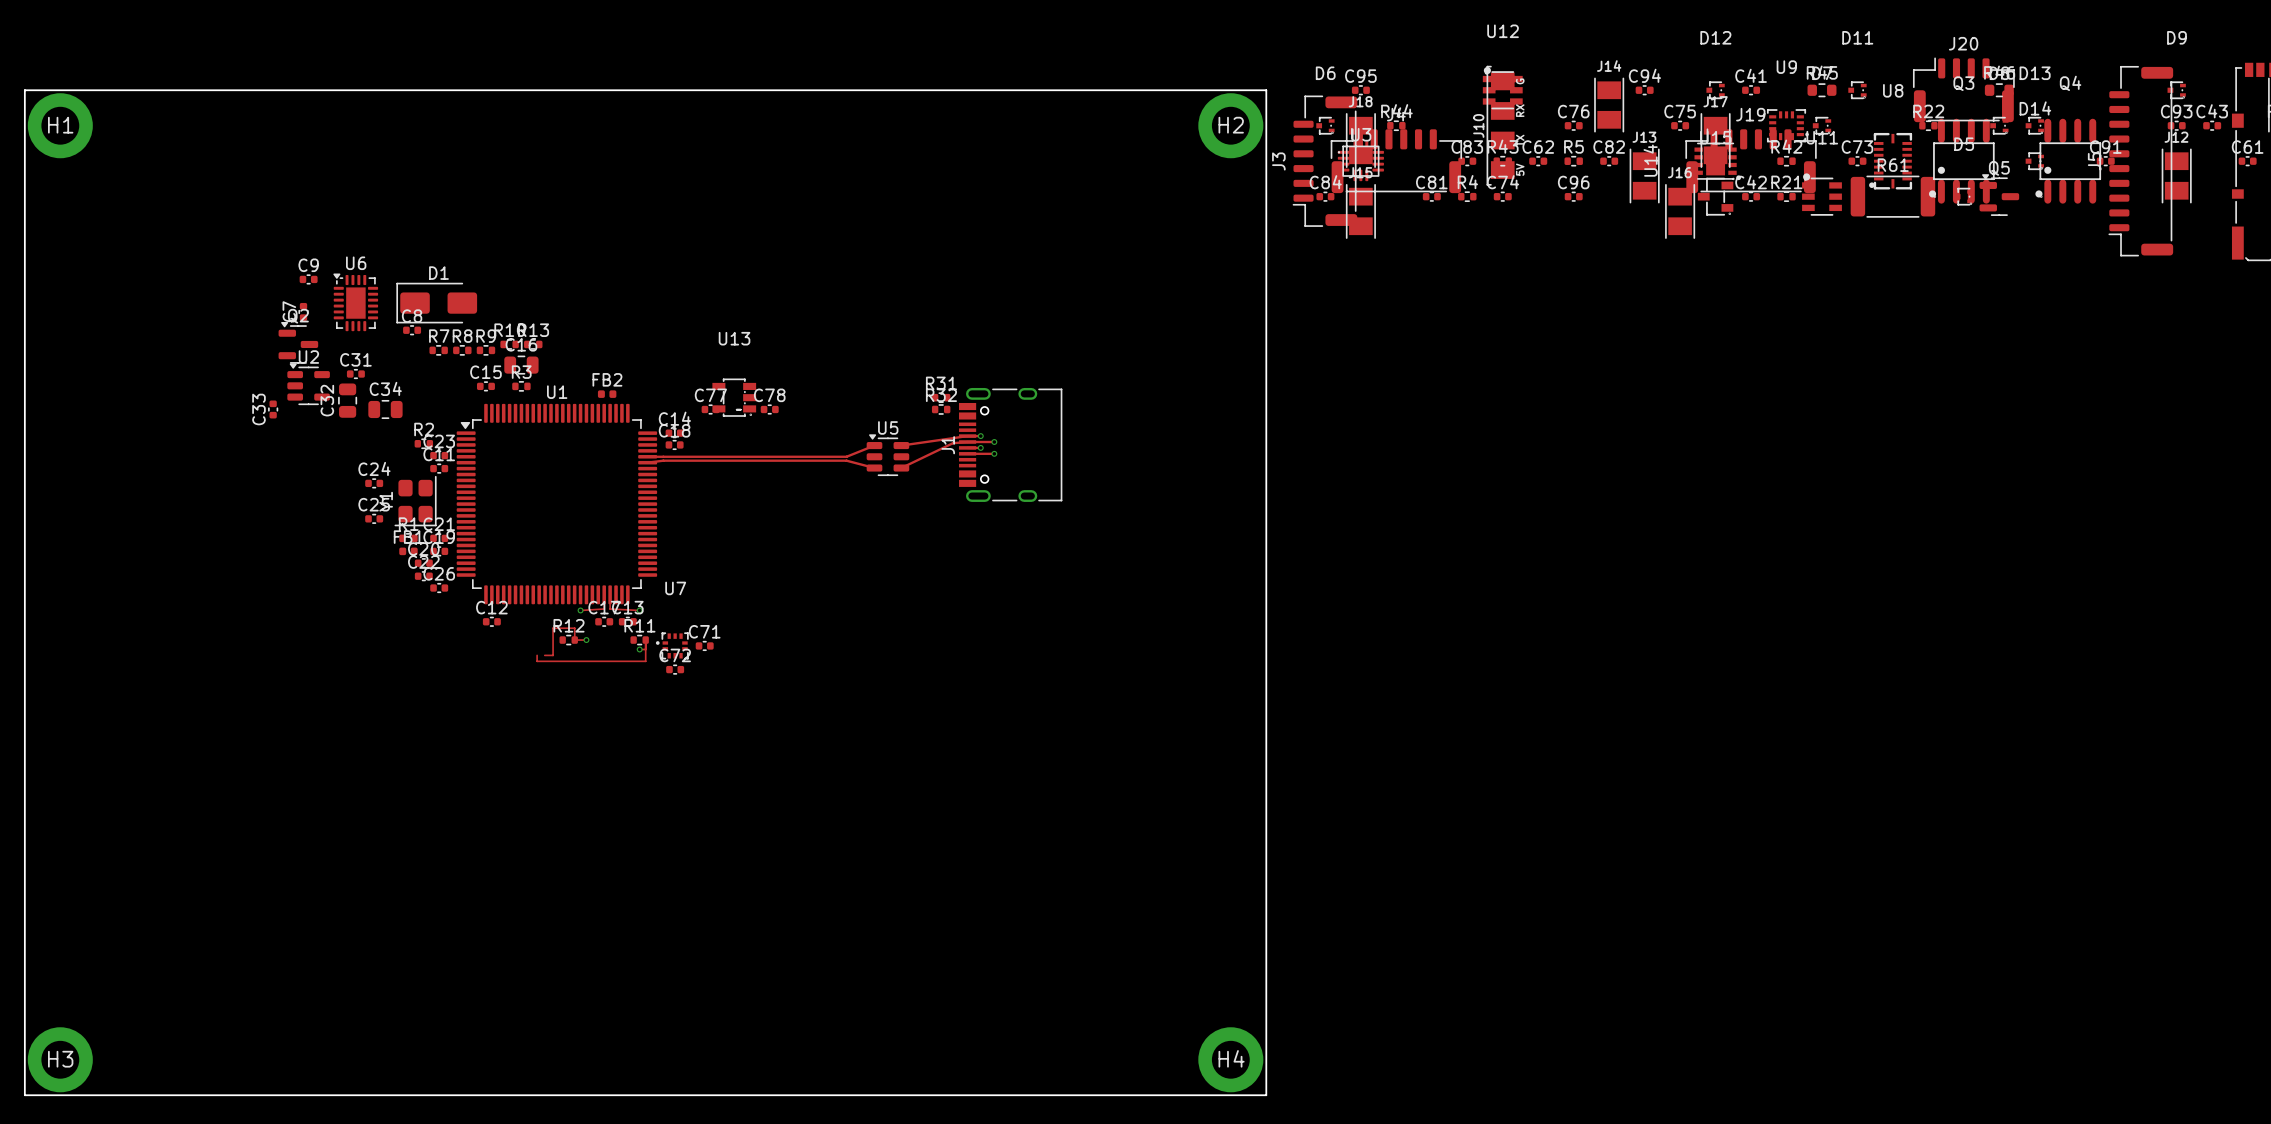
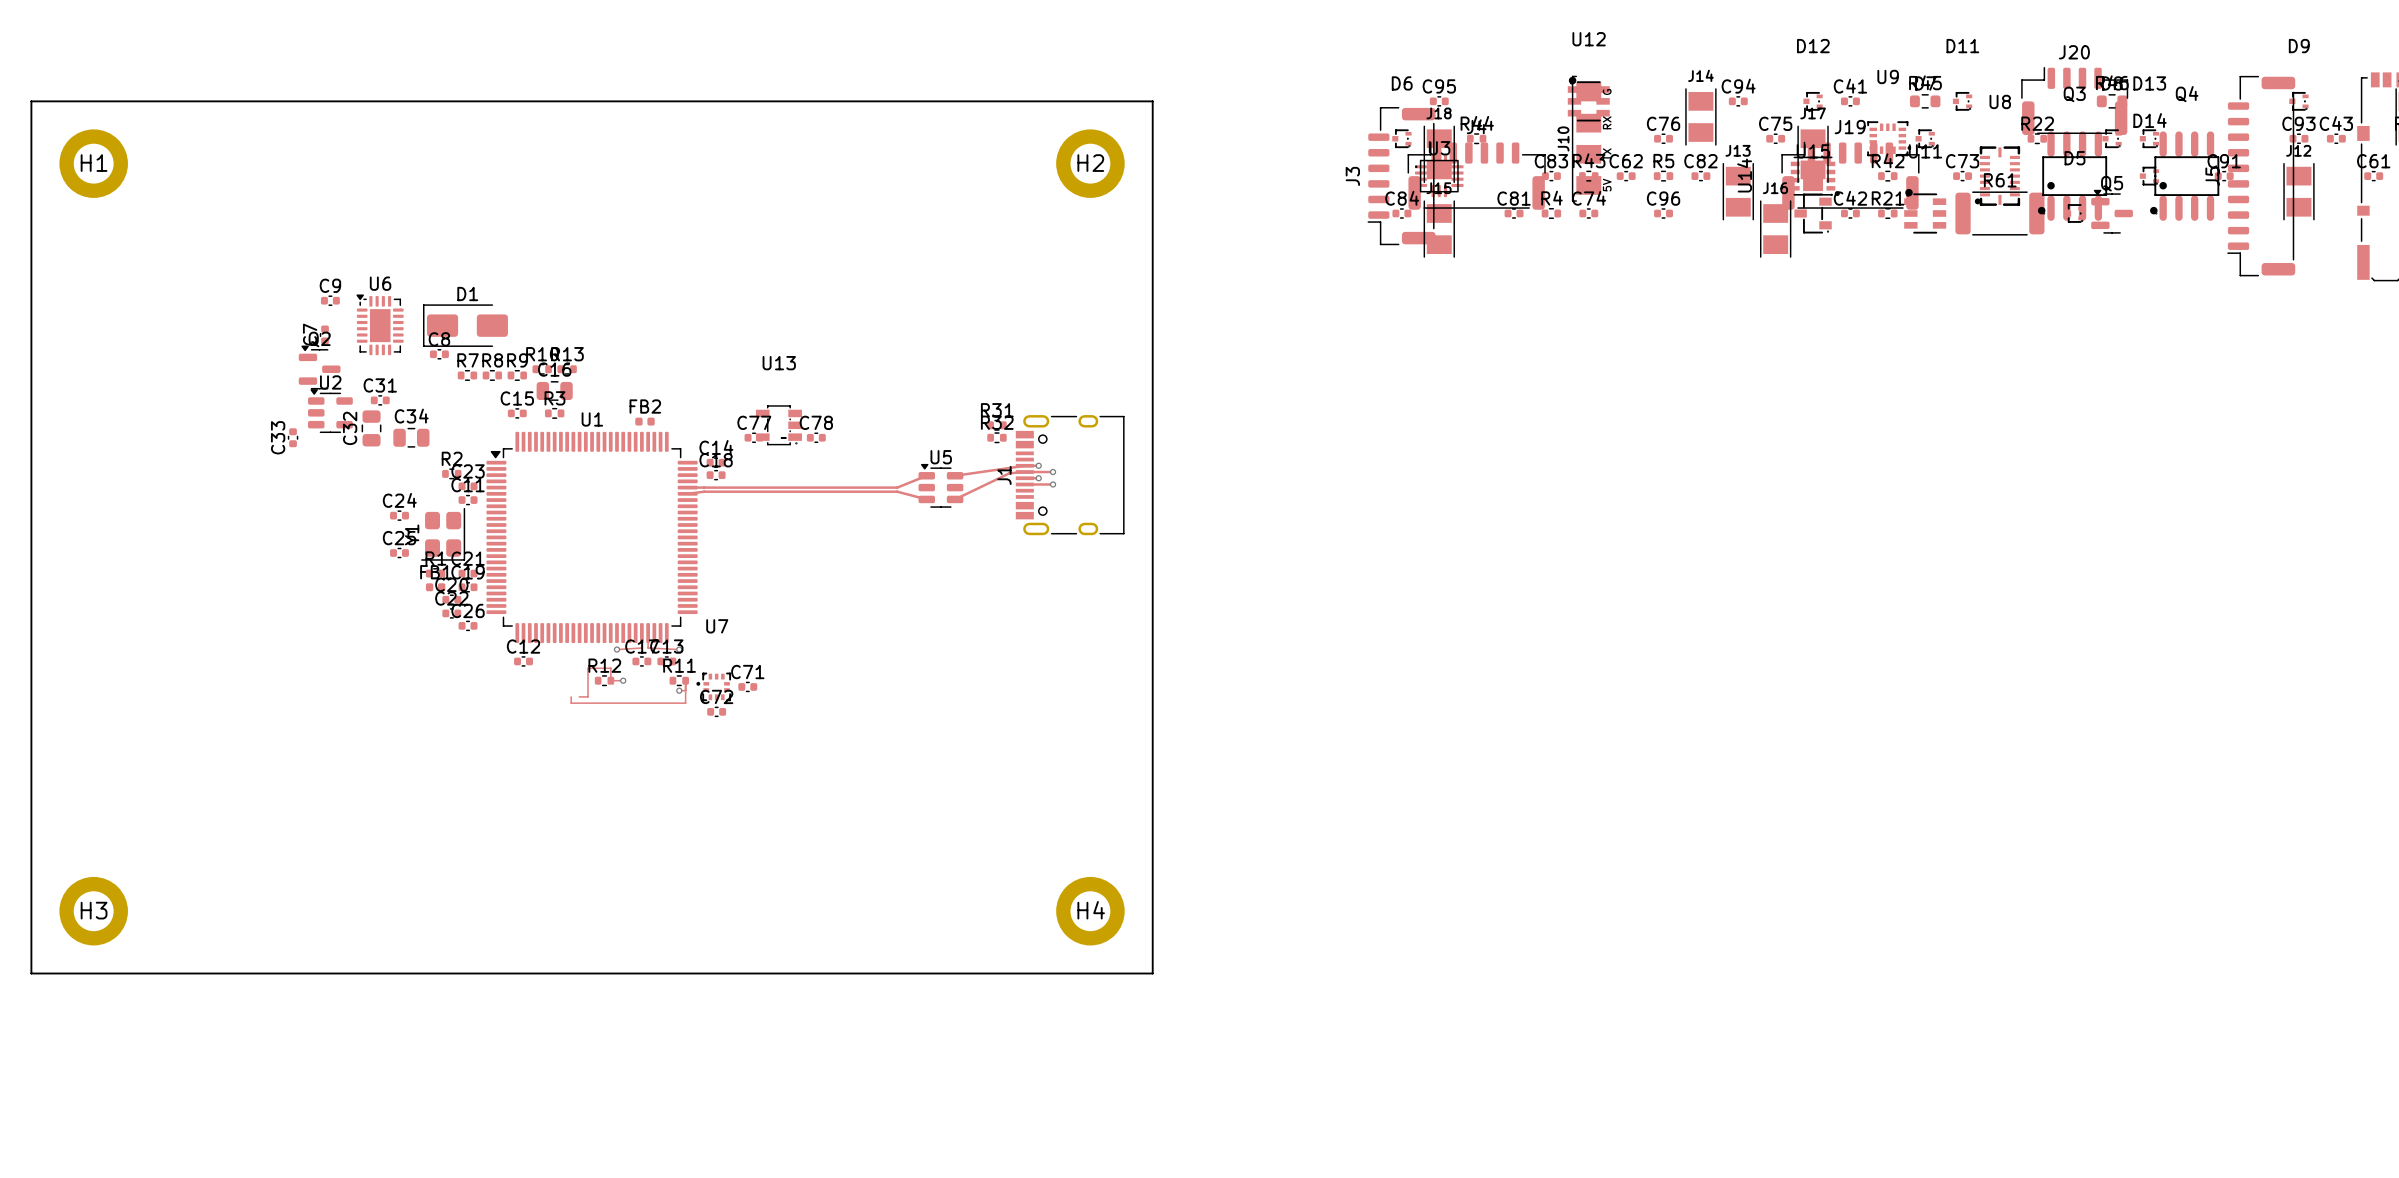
board edge: (1088, 90) (1266, 90) (1266, 1095) (24, 1095) (24, 917) -> (1152, 101) (1152, 973) (31, 973)
H1 position: (60, 125) -> (93, 163)
H2 position: (1230, 125) -> (1090, 163)
H3 position: (60, 1059) -> (93, 911)
H4 position: (1230, 1059) -> (1090, 911)

